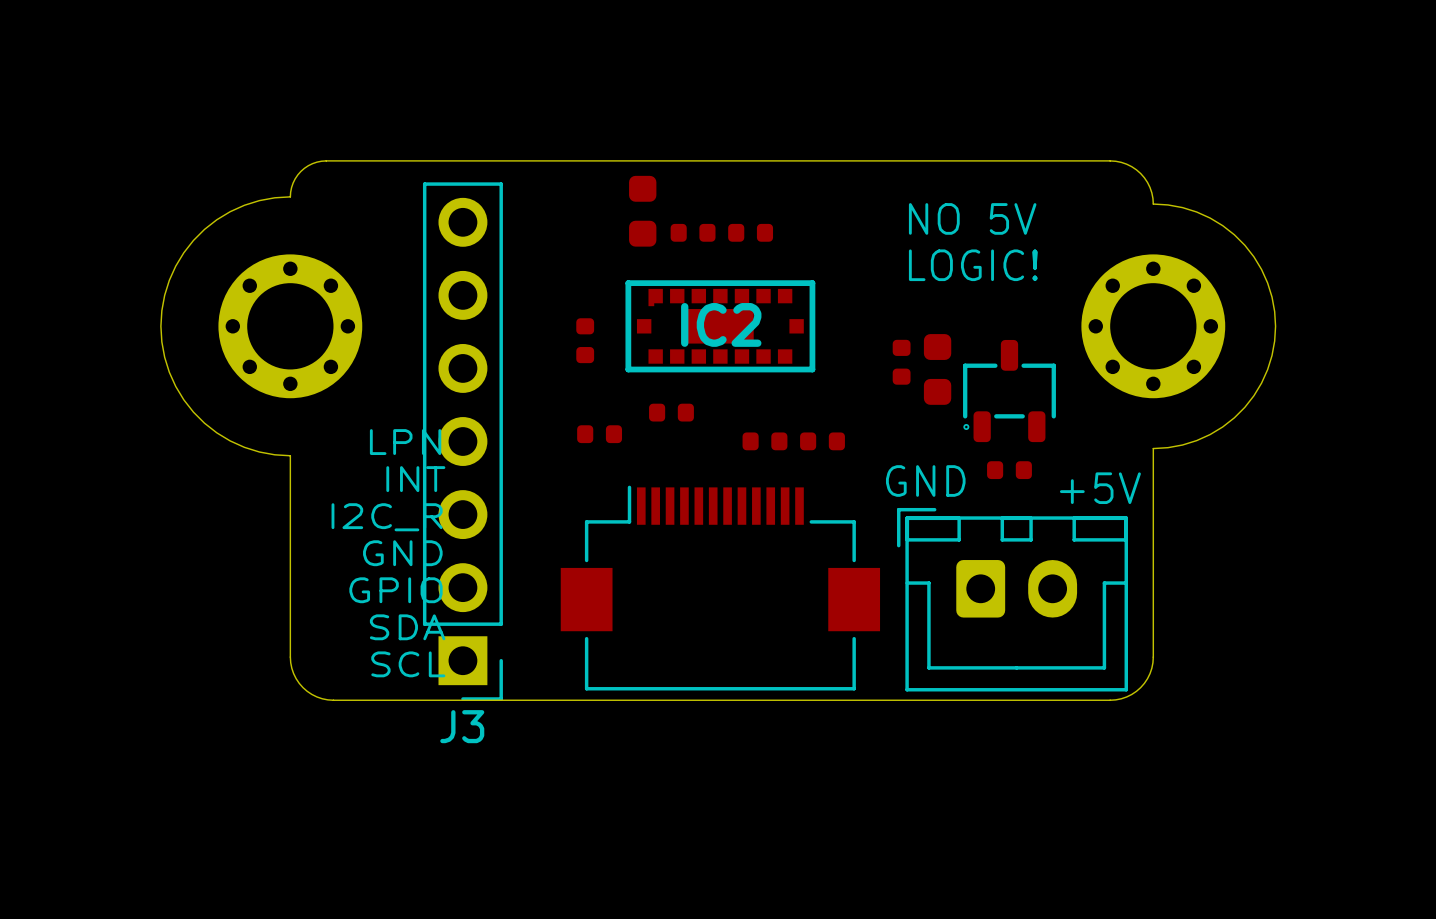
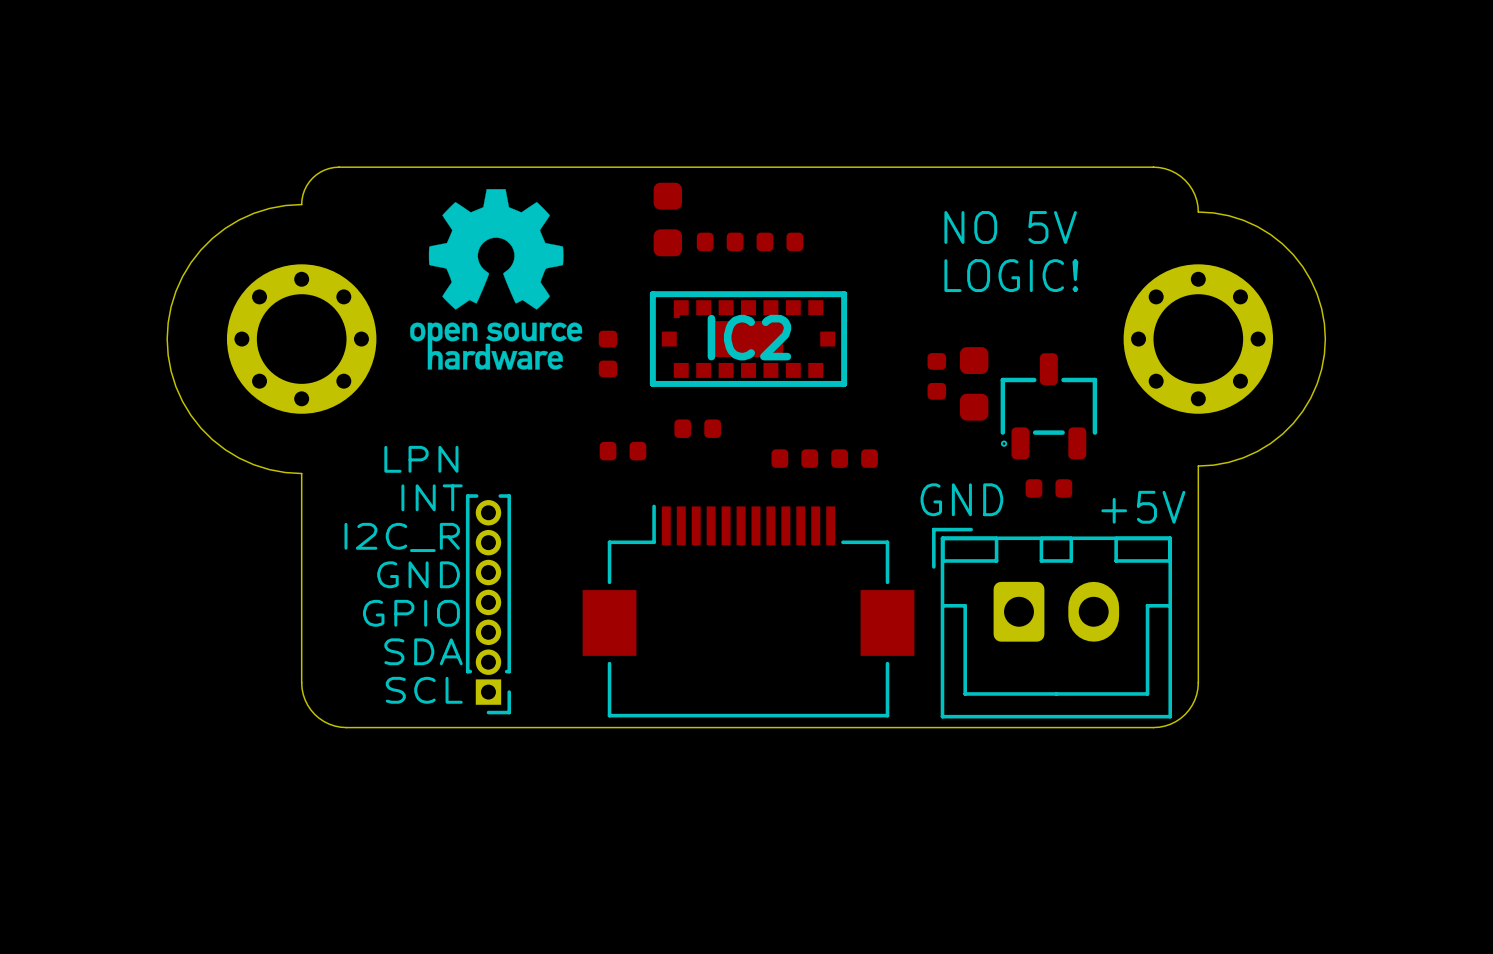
drawing: none -> [410, 189, 583, 370]
J3: (462, 441) -> none
part: none -> (488, 604)

